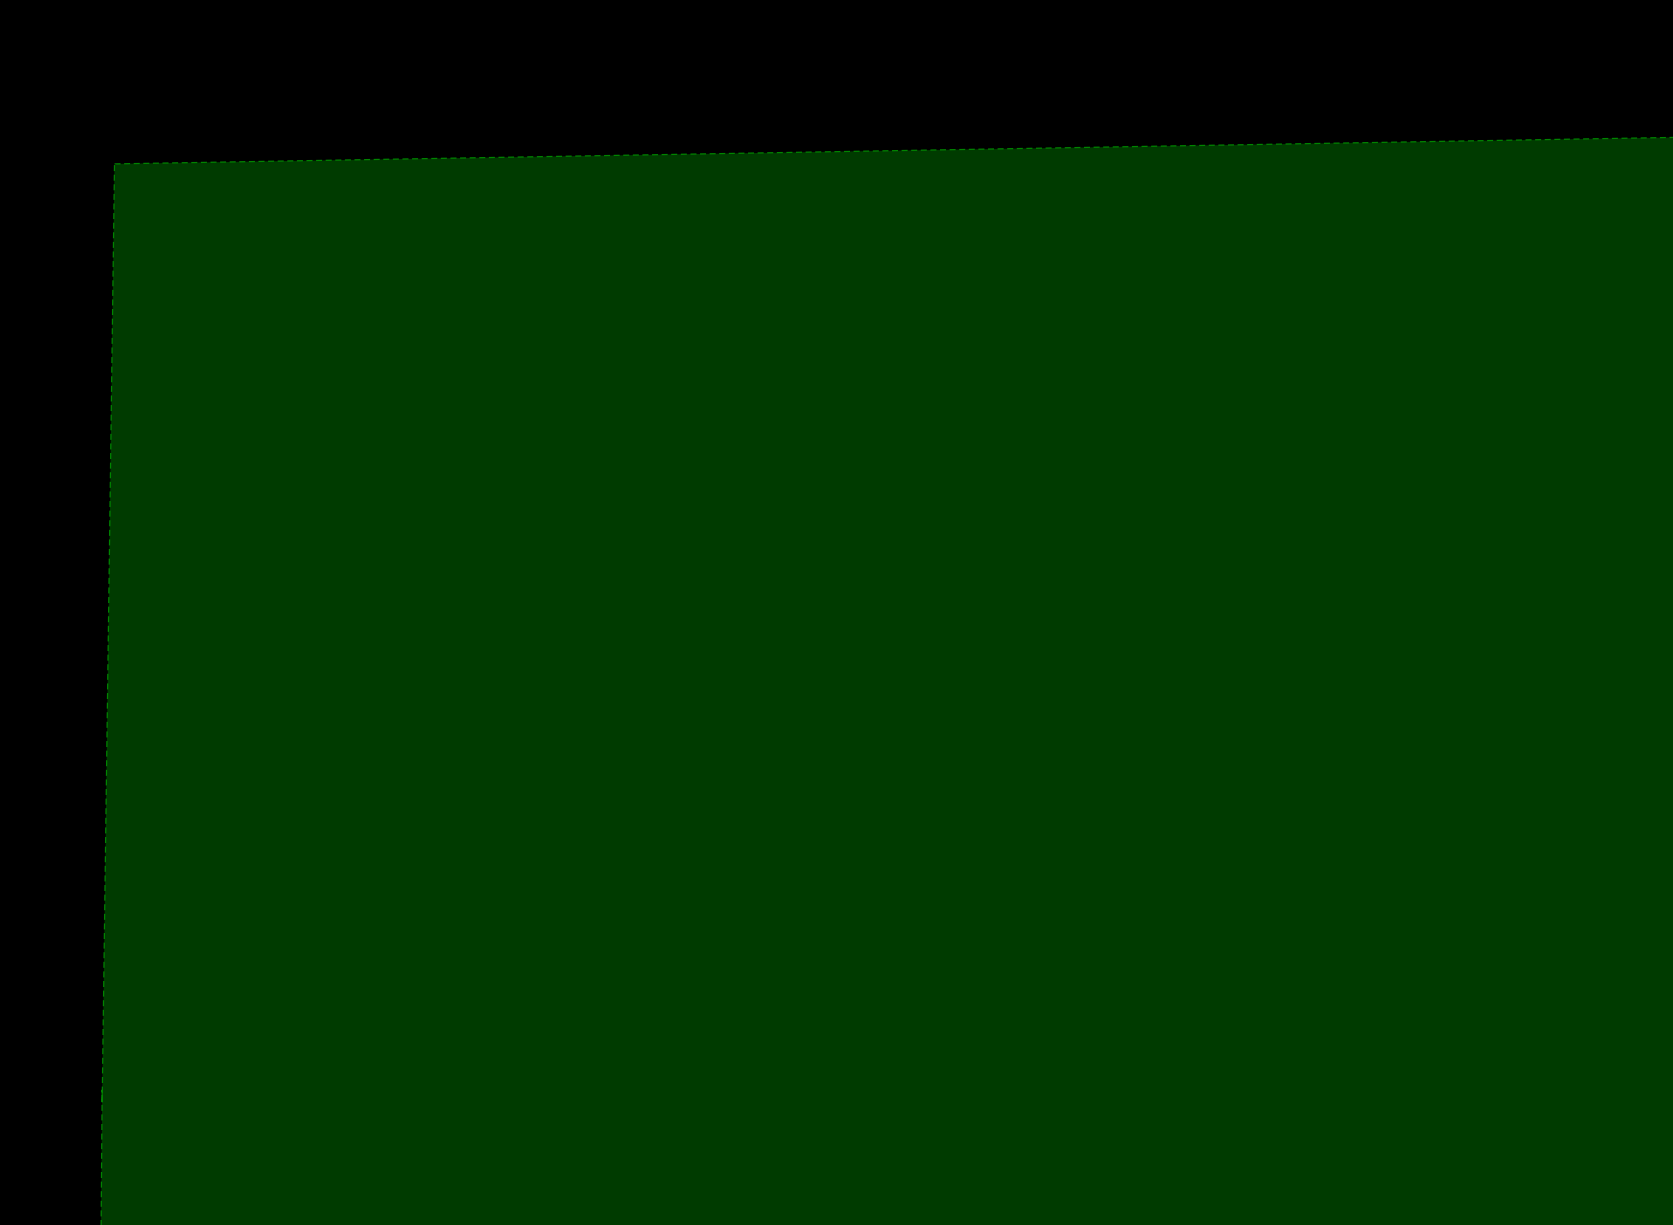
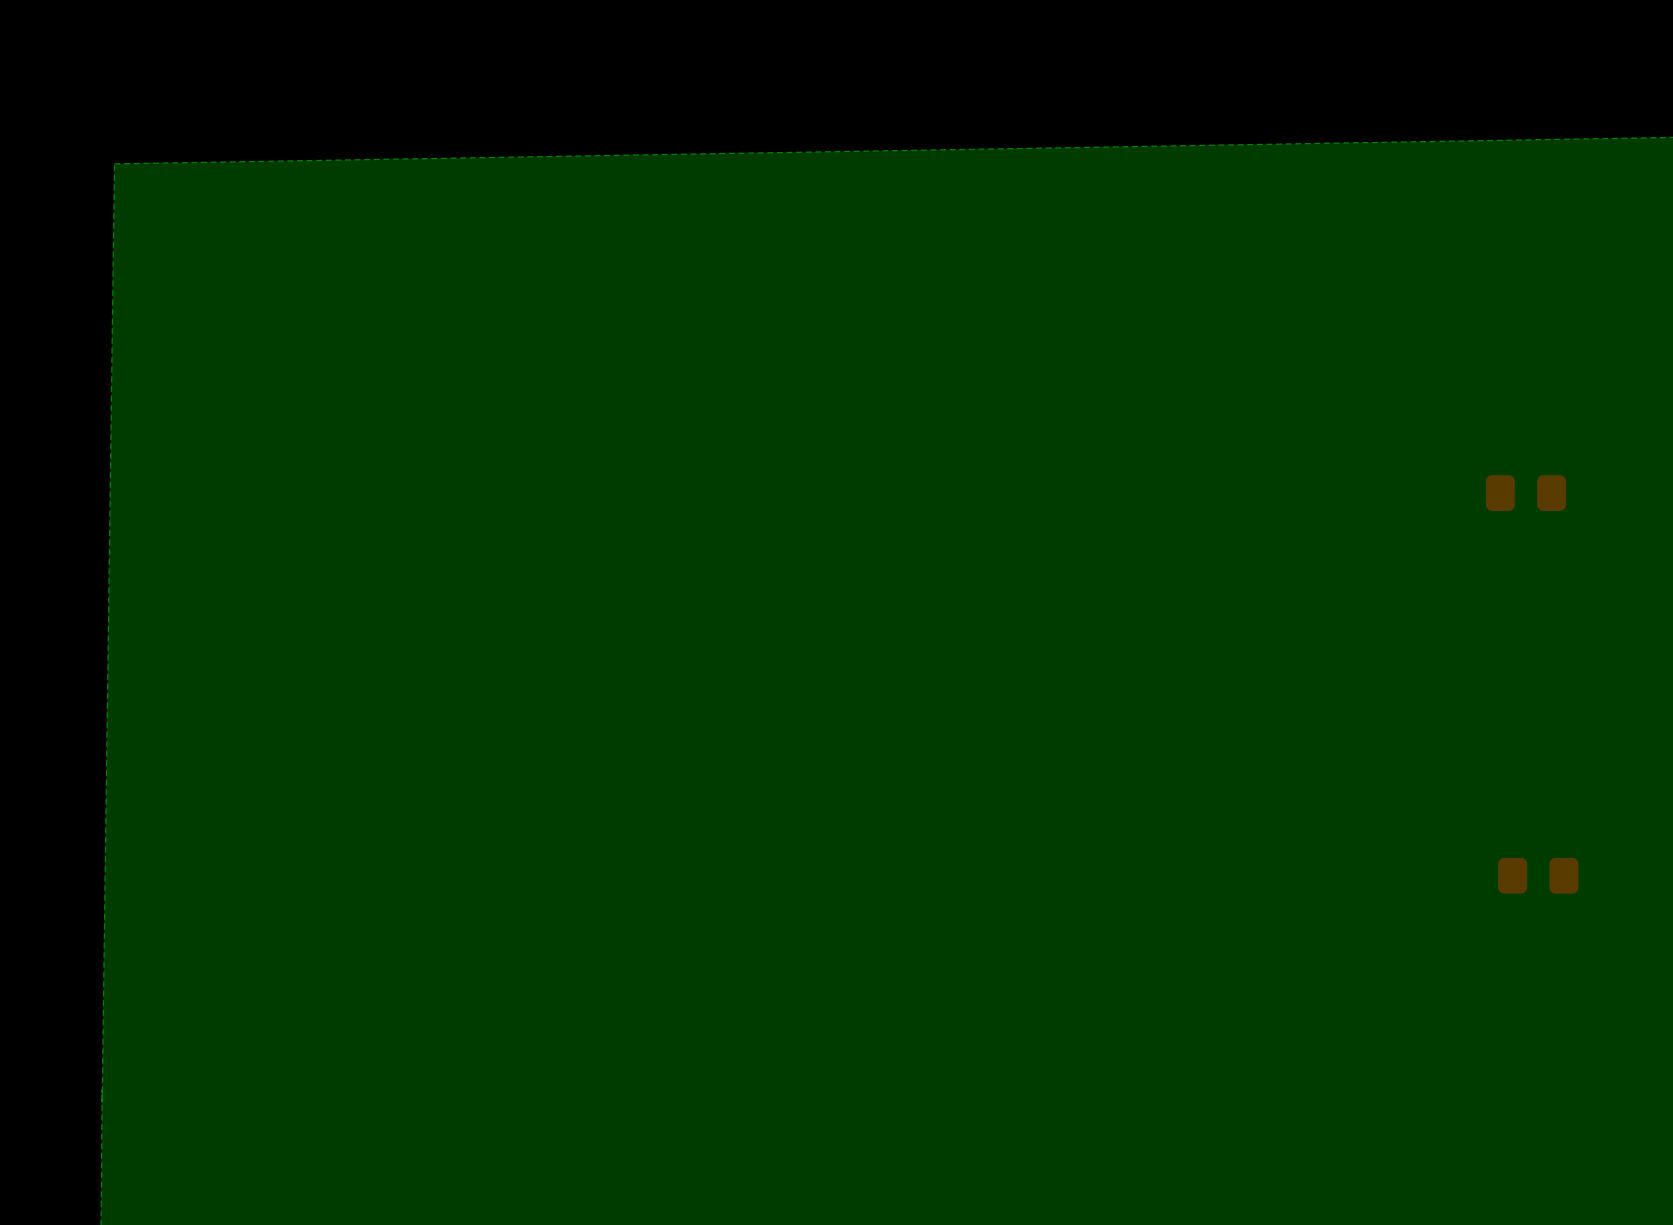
part: none -> (1525, 493)
part: none -> (1538, 875)

